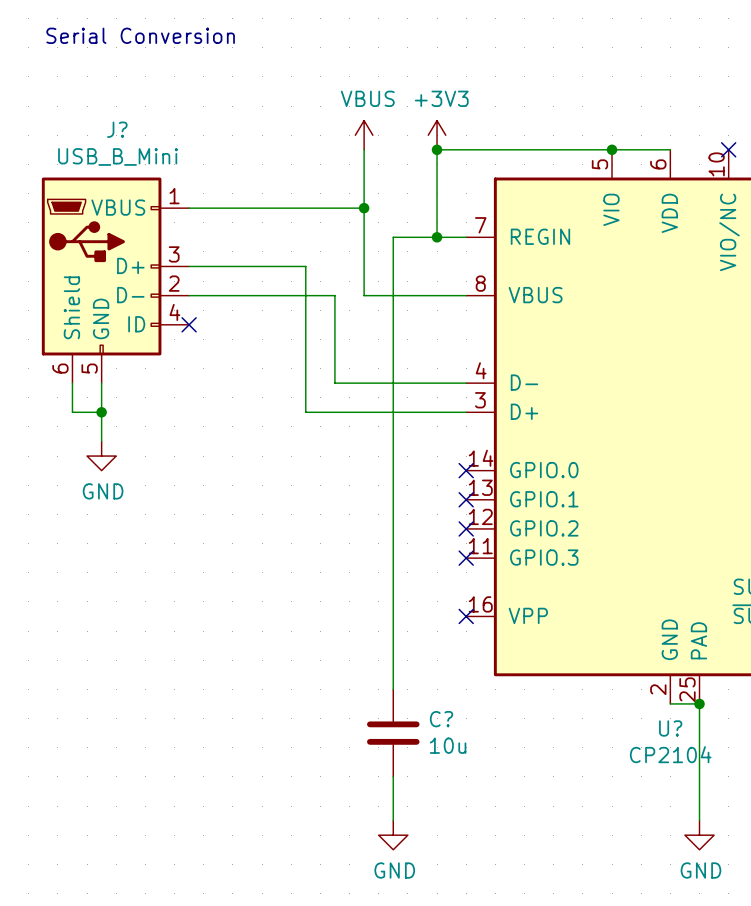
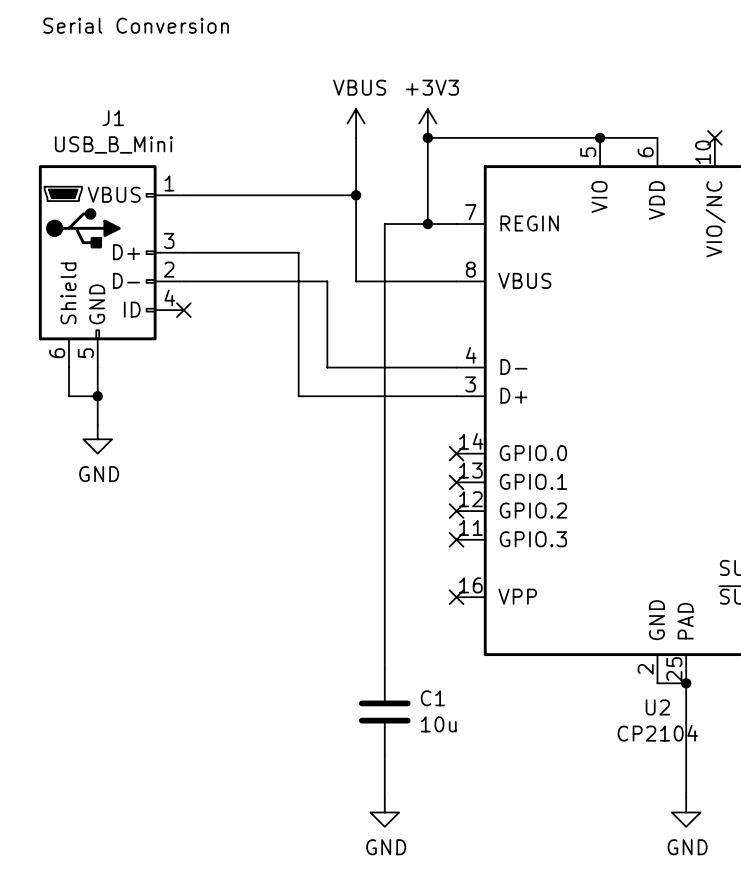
J? name: J? (117, 129) -> J1 (113, 118)
C? name: C? (441, 719) -> C1 (432, 698)
U? name: U? (670, 728) -> U2 (657, 707)

